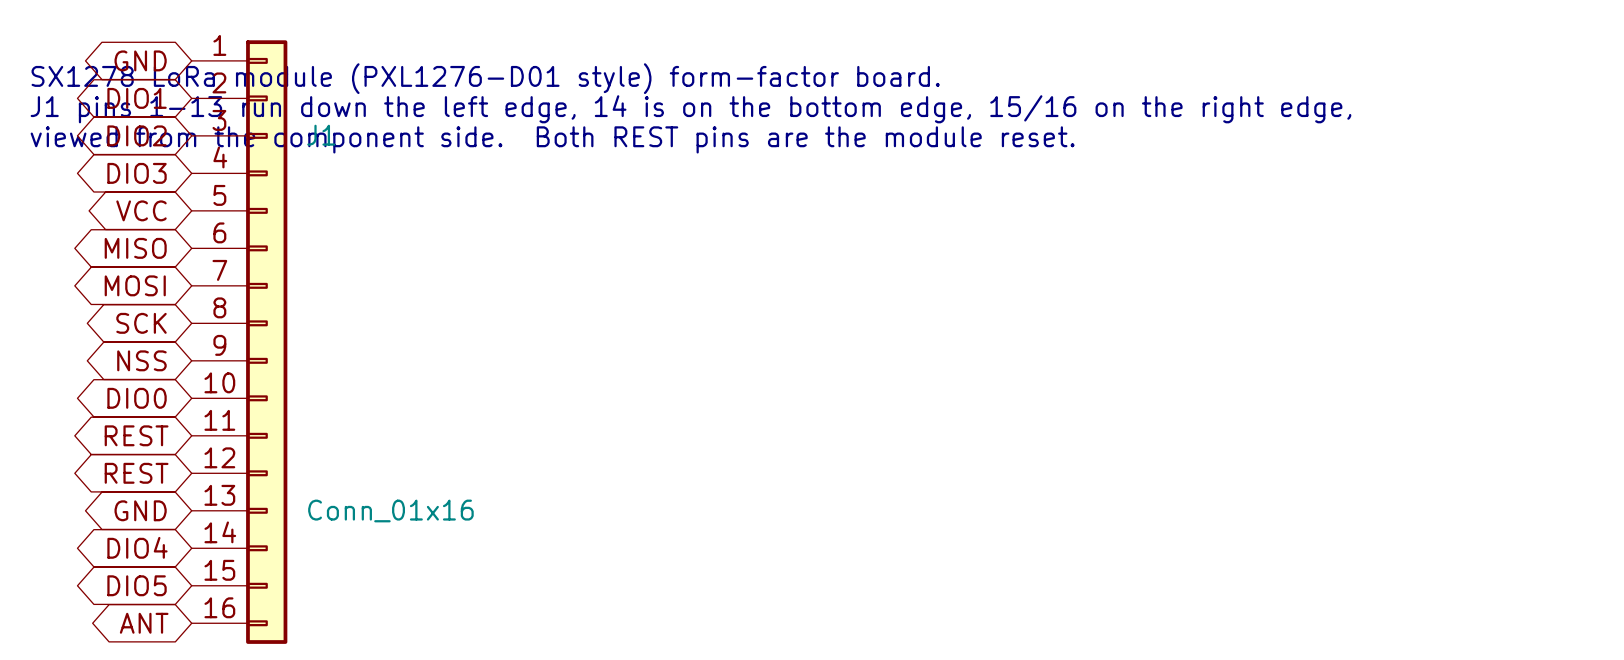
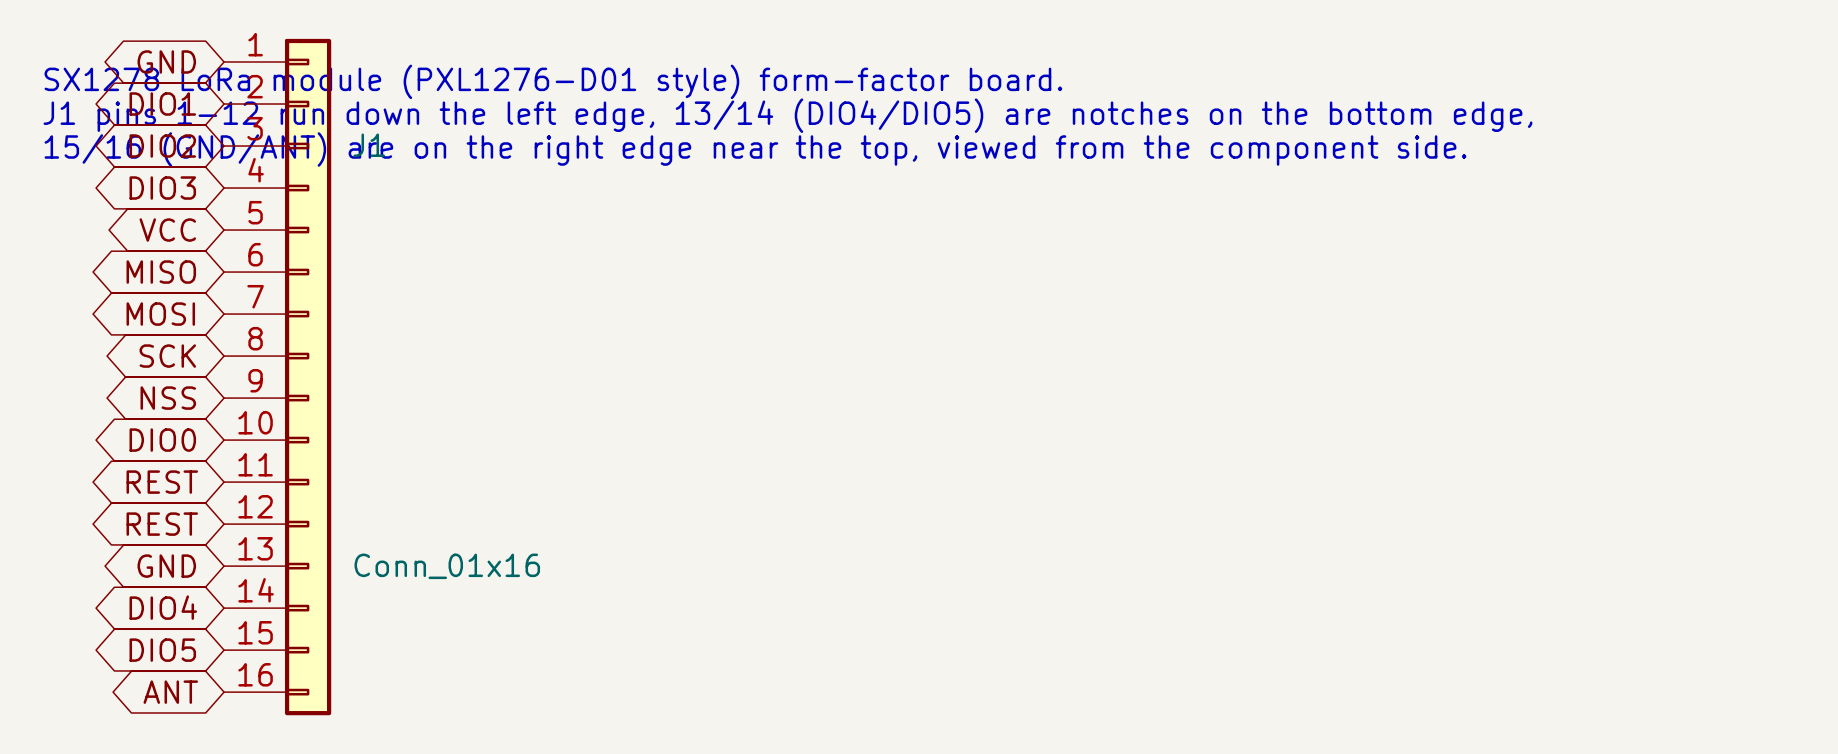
text: J1 pins 1-13 run down the left edge, 14 is on the bottom edge, 15/16 on the right edge, (690, 109) -> J1 pins 1-12 run down the left edge, 13/14 (DIO4/DIO5) are notches on the bottom edge, (787, 115)
text: viewed from the component side. Both REST pins are the module reset. (552, 139) -> 15/16 (GND/ANT) are on the right edge near the top, viewed from the component side. (755, 149)

